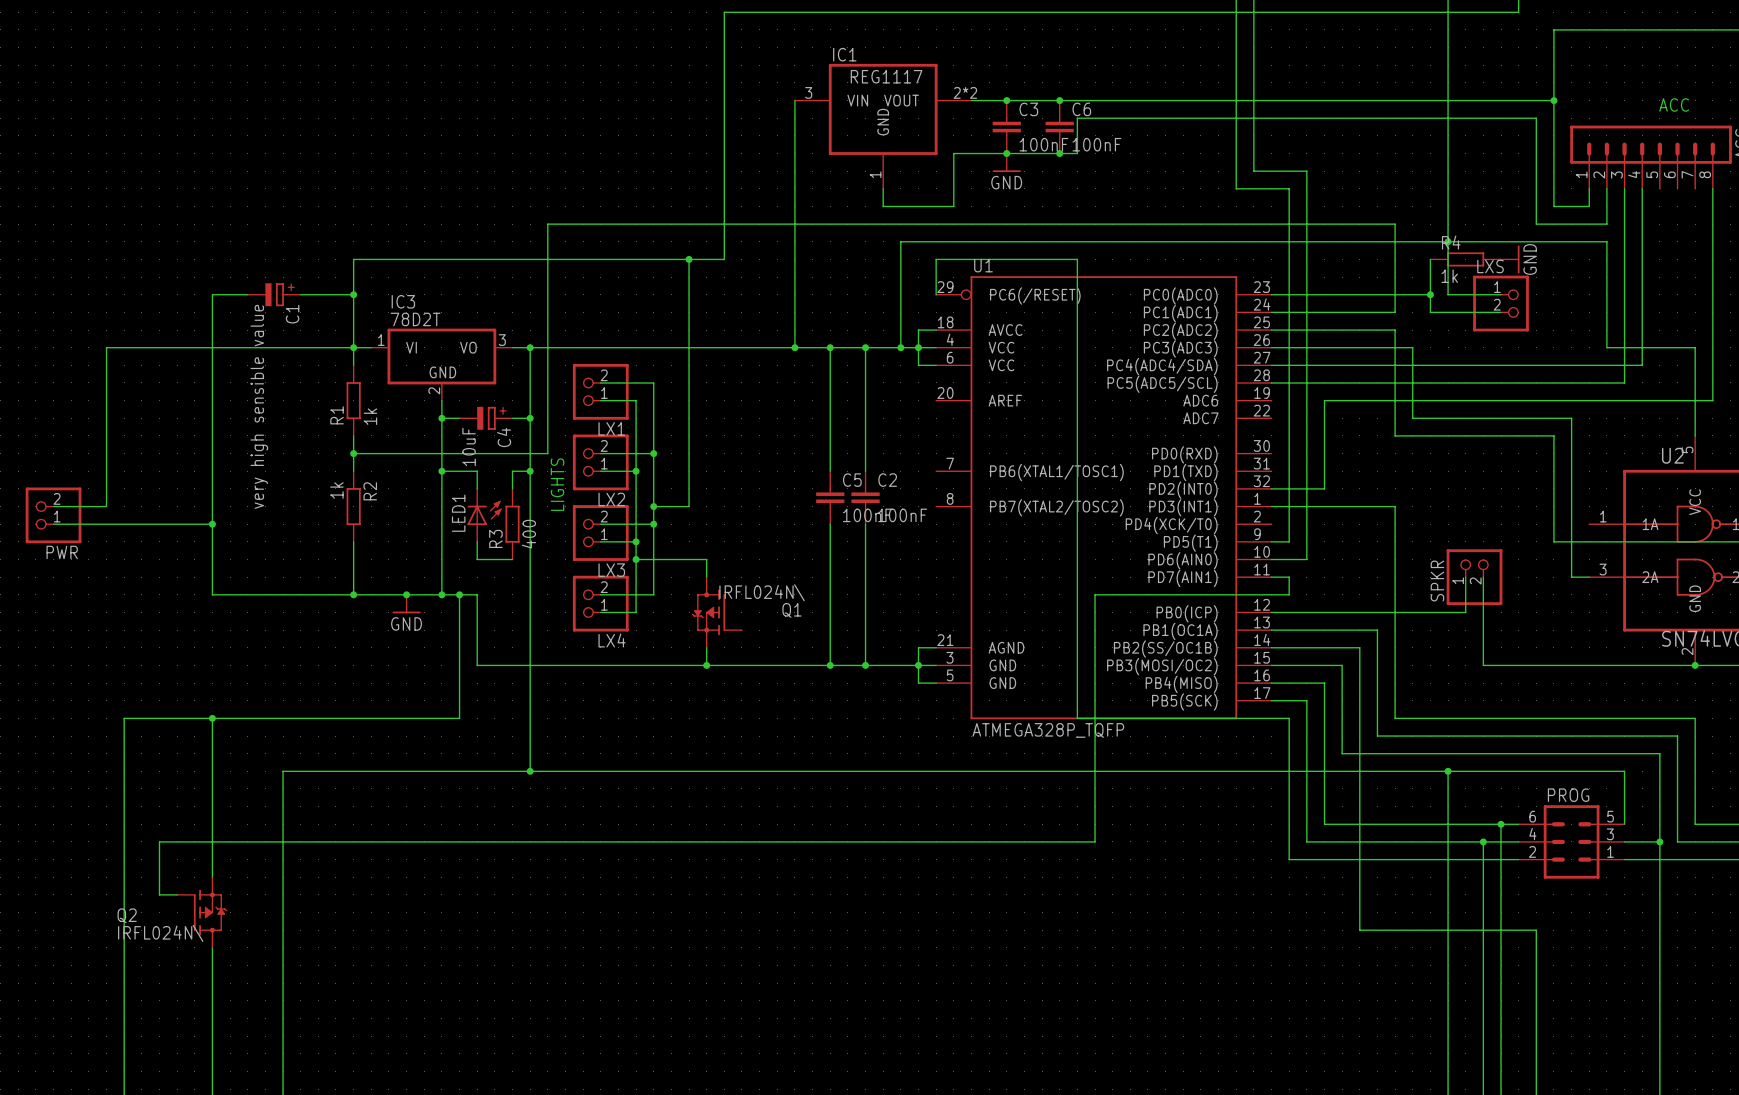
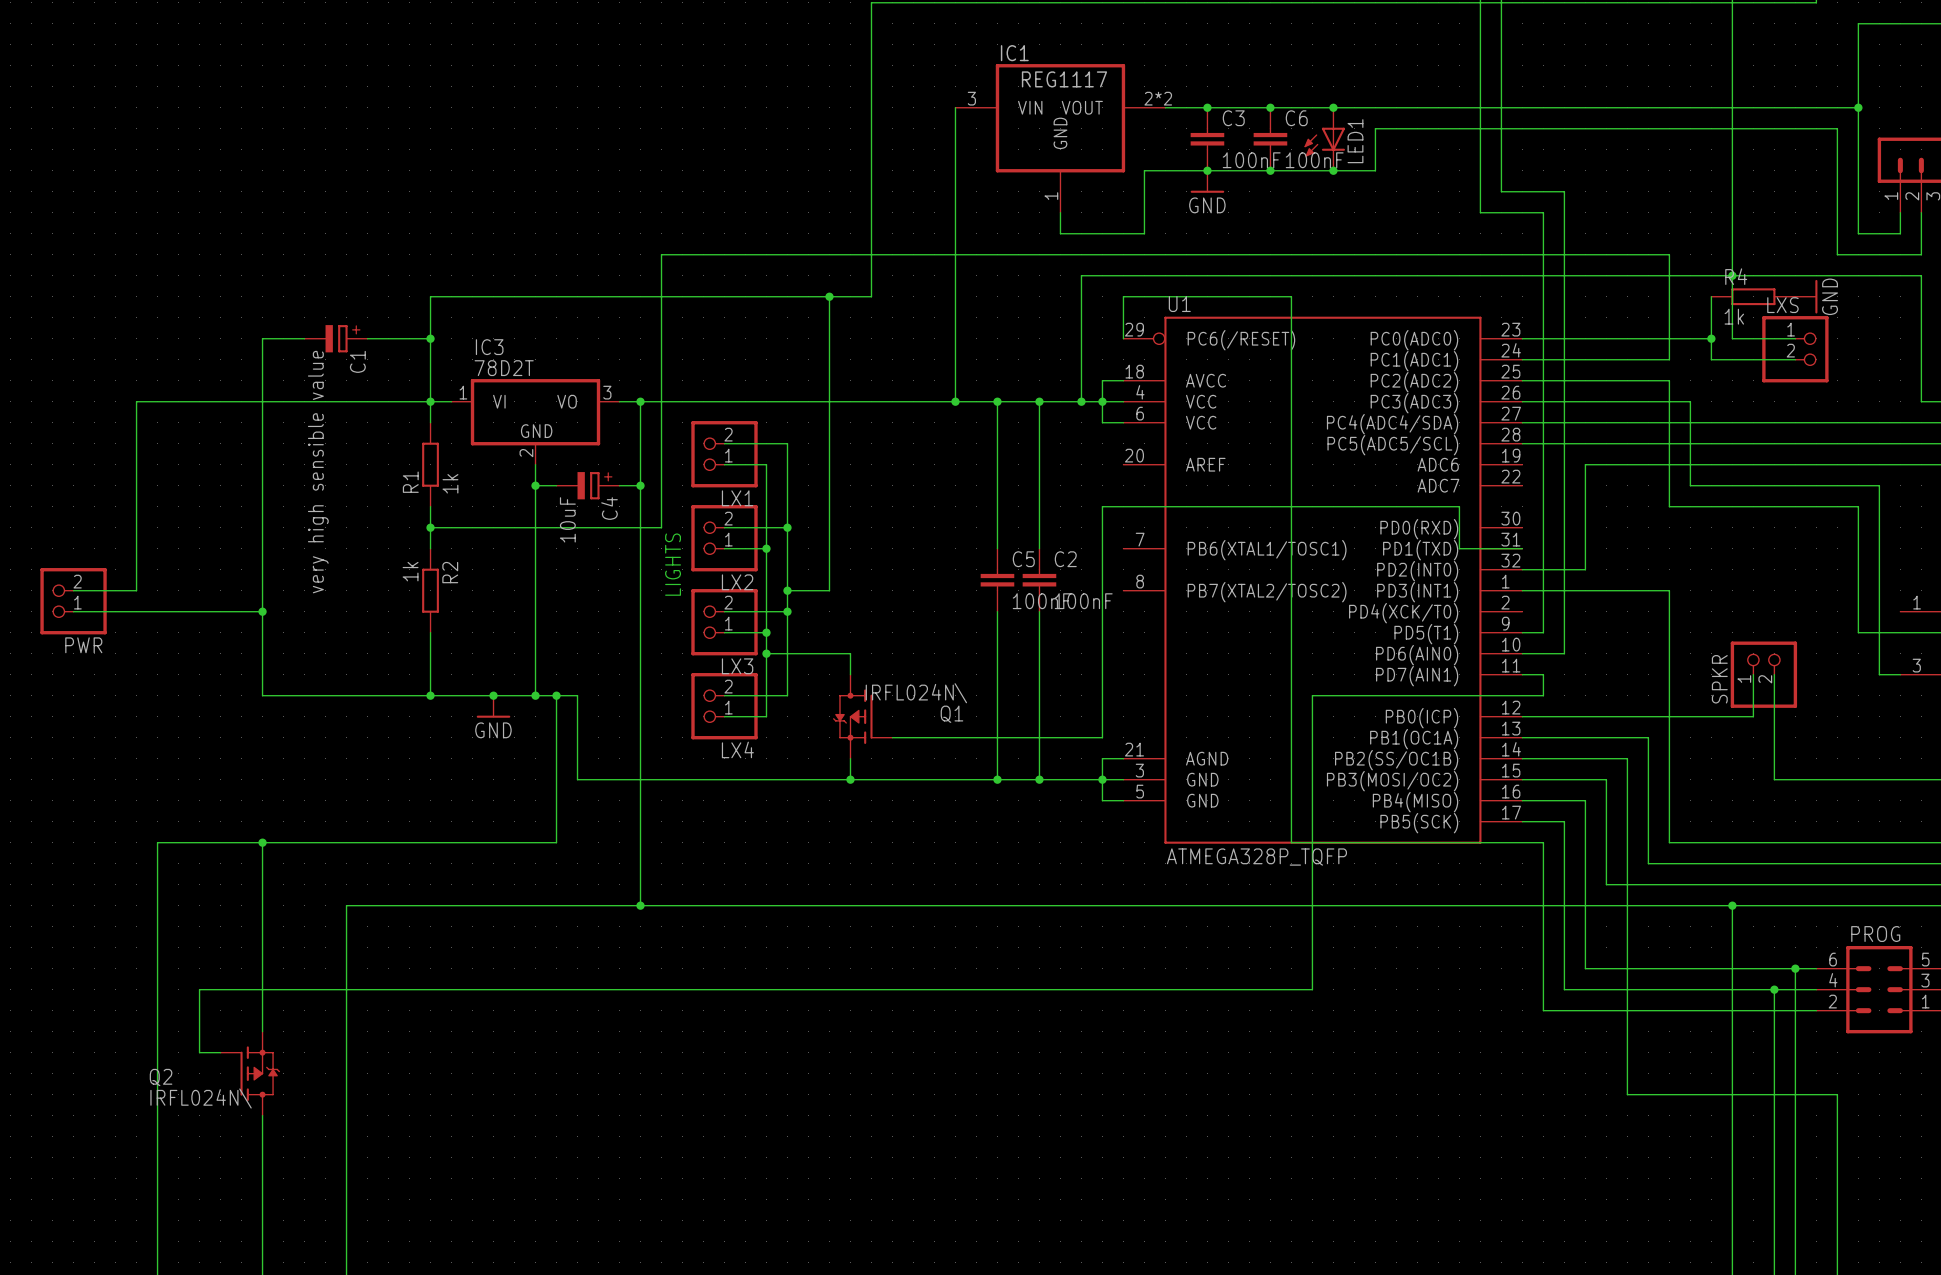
junction: none -> (1333, 107)
wire: (1147, 118) (1077, 118) (1077, 153) -> (1375, 128) (1375, 170) (1291, 170)
junction: none -> (1333, 170)
wire: (441, 471) (477, 471) (477, 488) -> none
junction: (441, 471) -> none
wire: (530, 471) (512, 471) (512, 488) -> none
junction: (530, 471) -> none
wire: none -> (1522, 548) (1459, 548) (1459, 506) (1102, 506) (1102, 737) (892, 737)
LED1 rotation: 0° (484, 512) -> 180° (1324, 142)
LED1 position: (484, 515) -> (1324, 139)
R3: 400 (512, 524) -> none
wire: (477, 541) (477, 559) (512, 559) -> none

